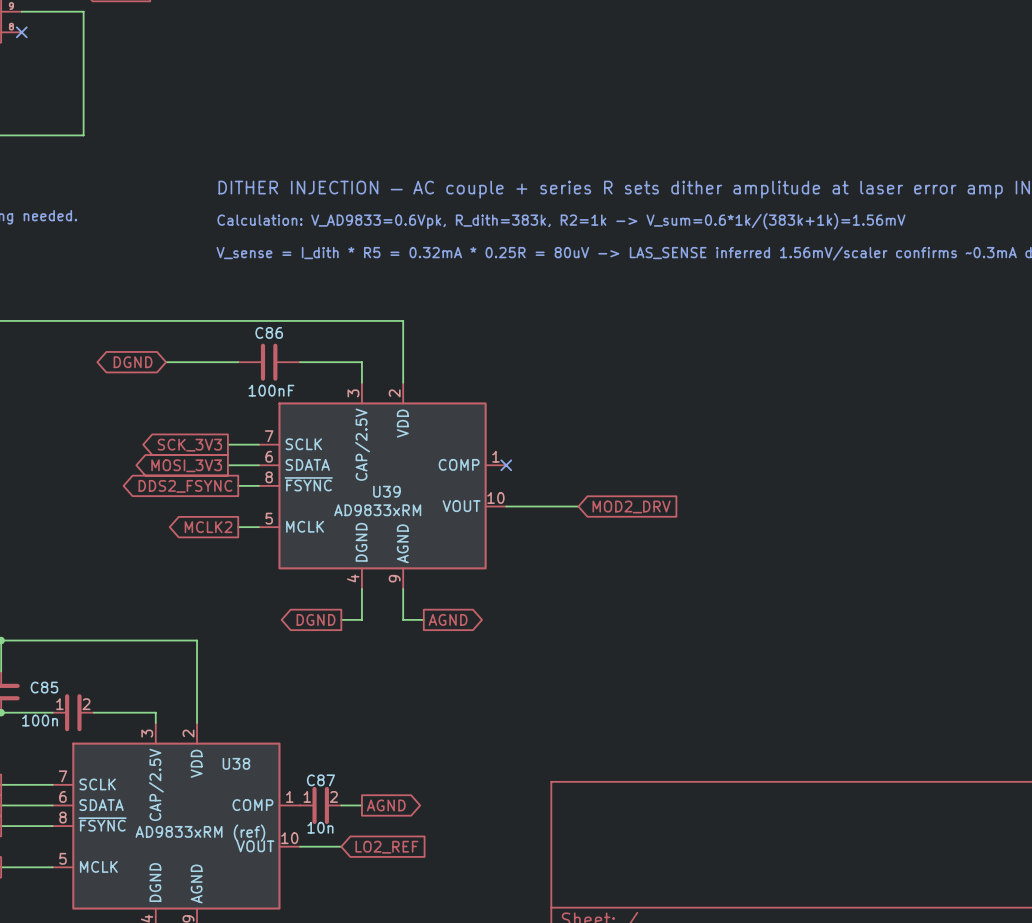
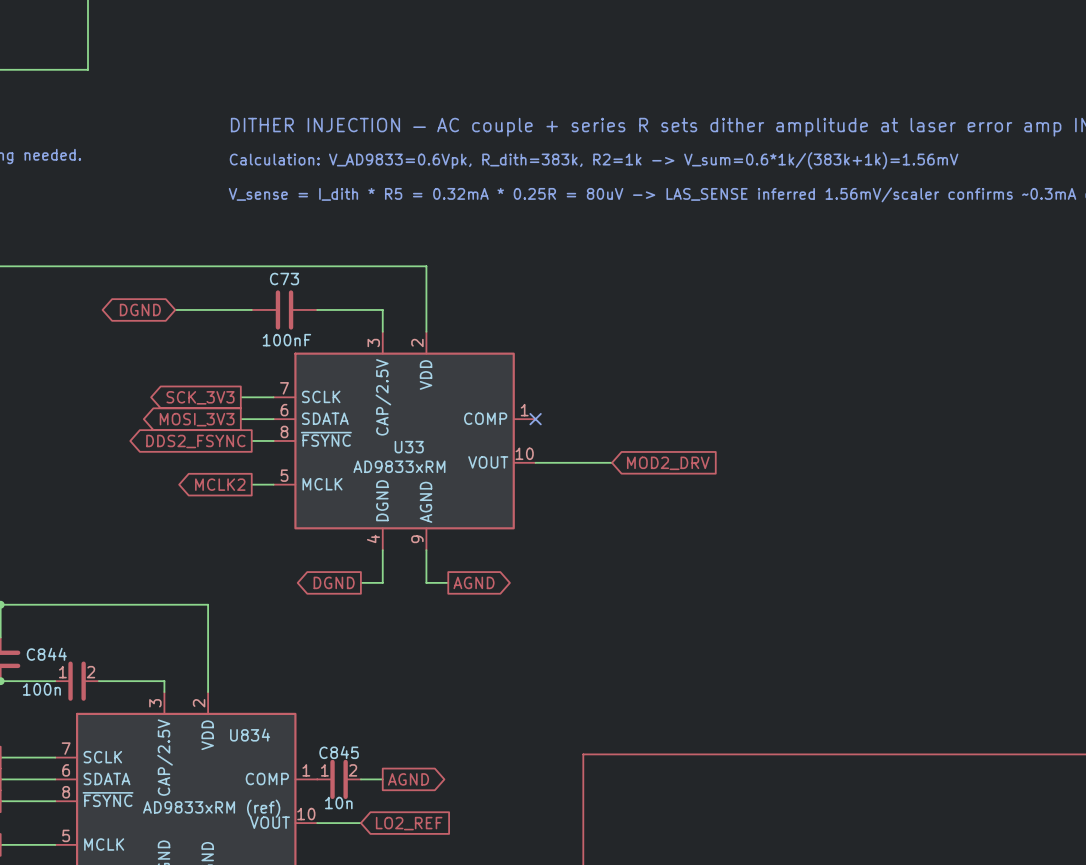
C86 name: C86 (269, 332) -> C73 (284, 279)
U39 name: U39 (386, 491) -> U33 (409, 447)
C85 name: C85 (44, 687) -> C844 (46, 654)
U38 name: U38 (236, 763) -> U834 (250, 735)
C87 name: C87 (320, 780) -> C845 (339, 752)

